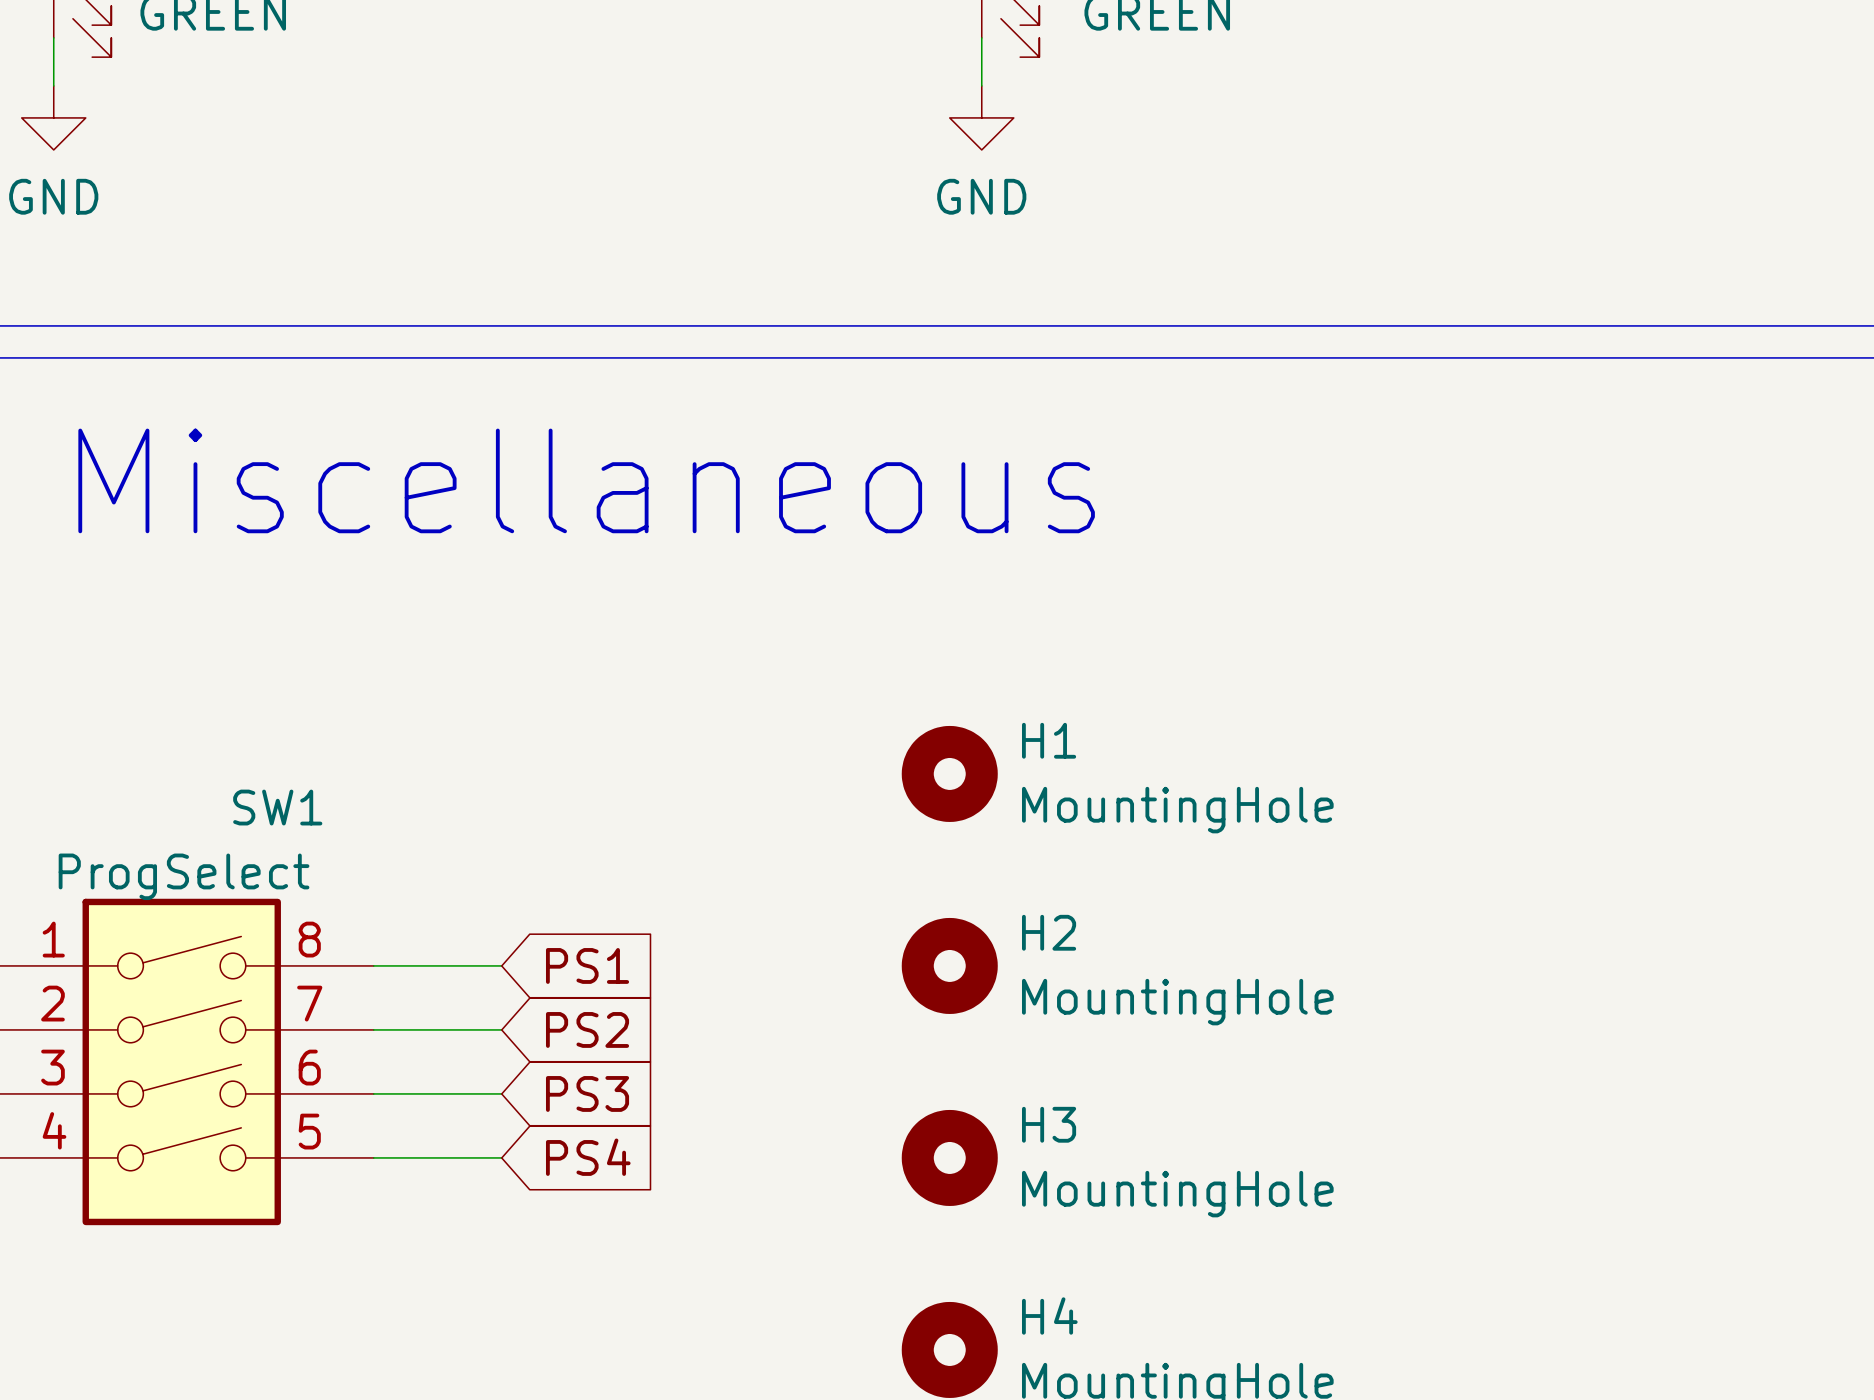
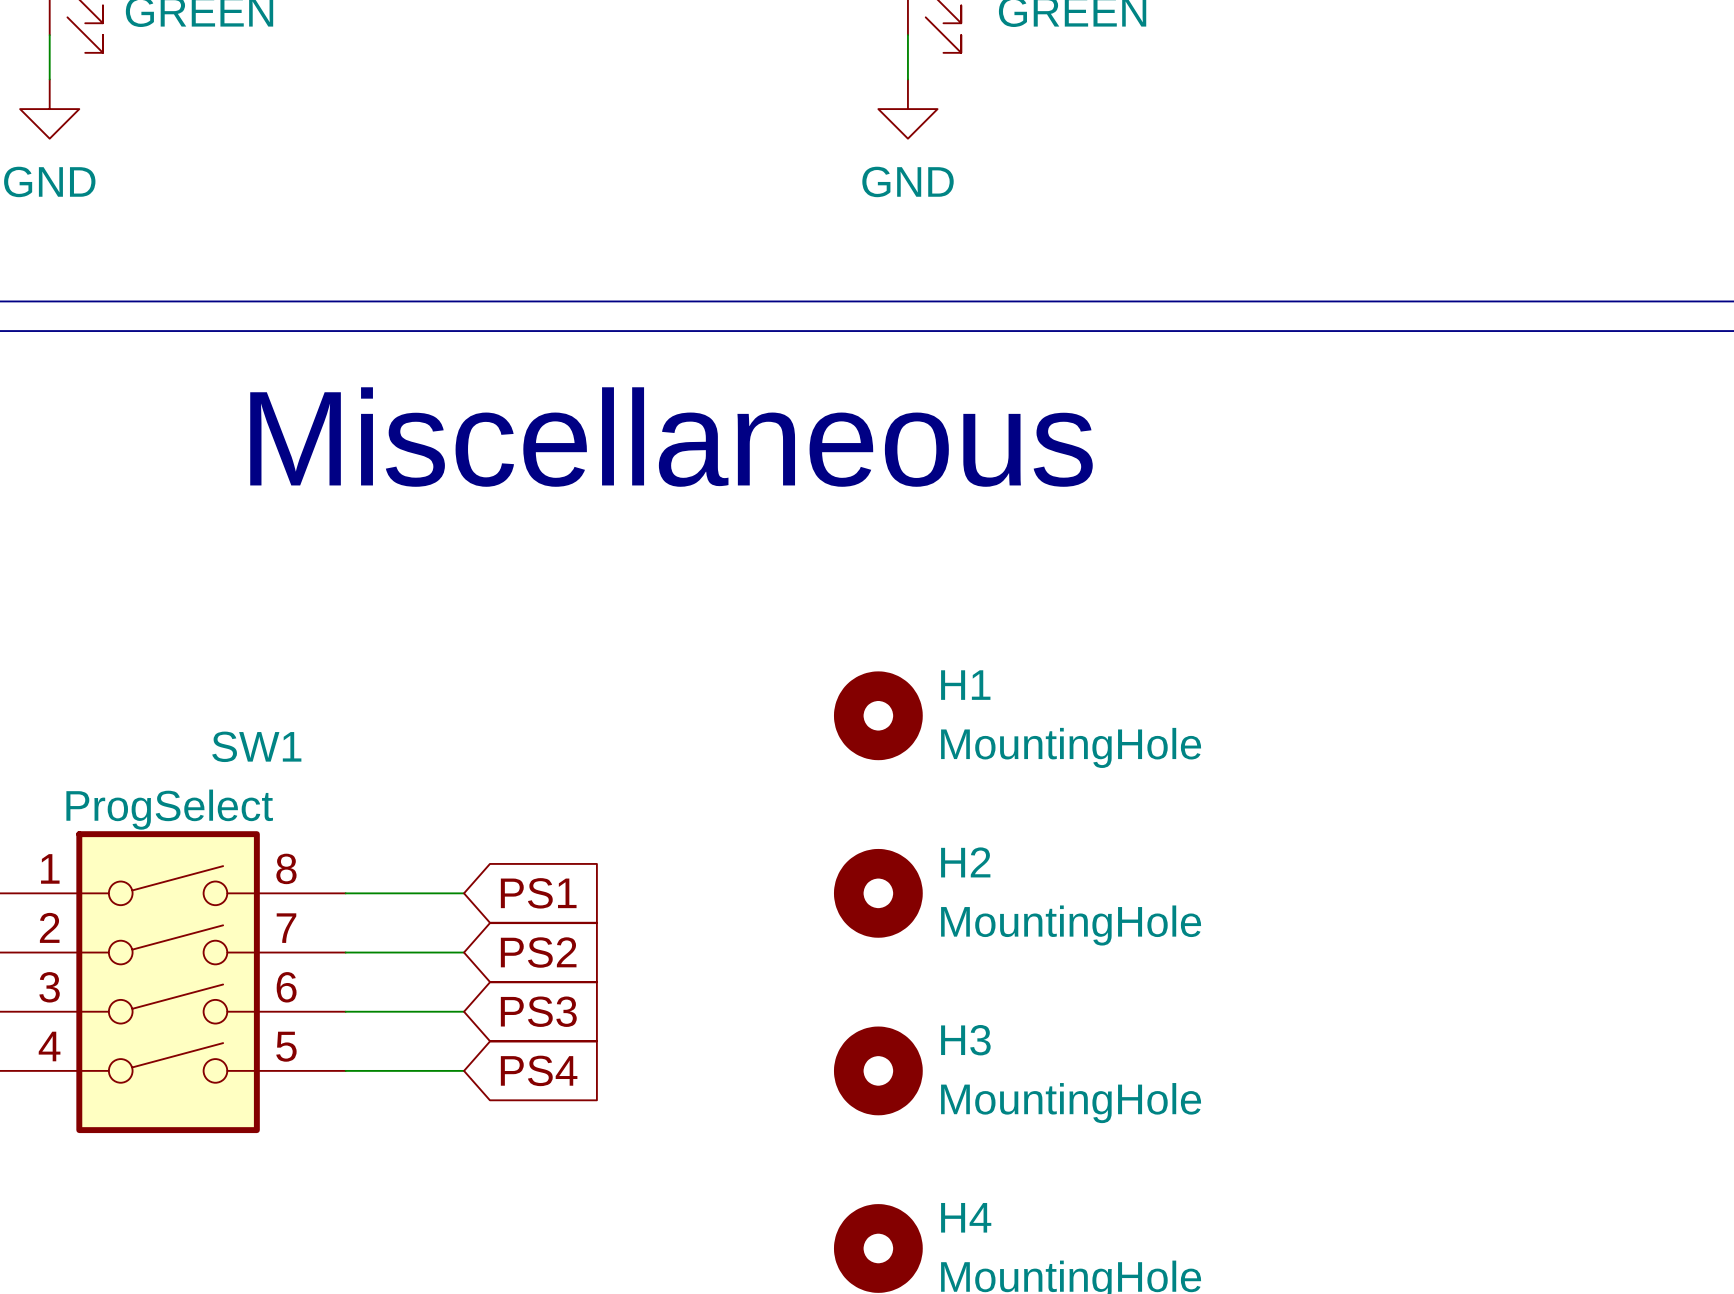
text position: Miscellaneous (586, 480) -> Miscellaneous (671, 437)

